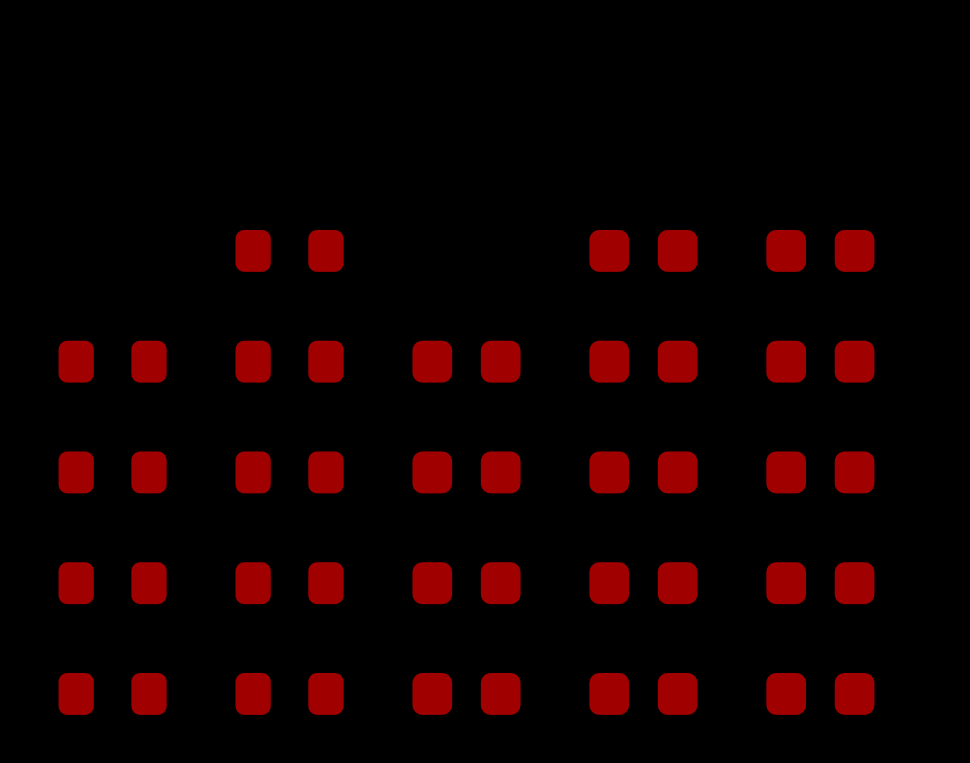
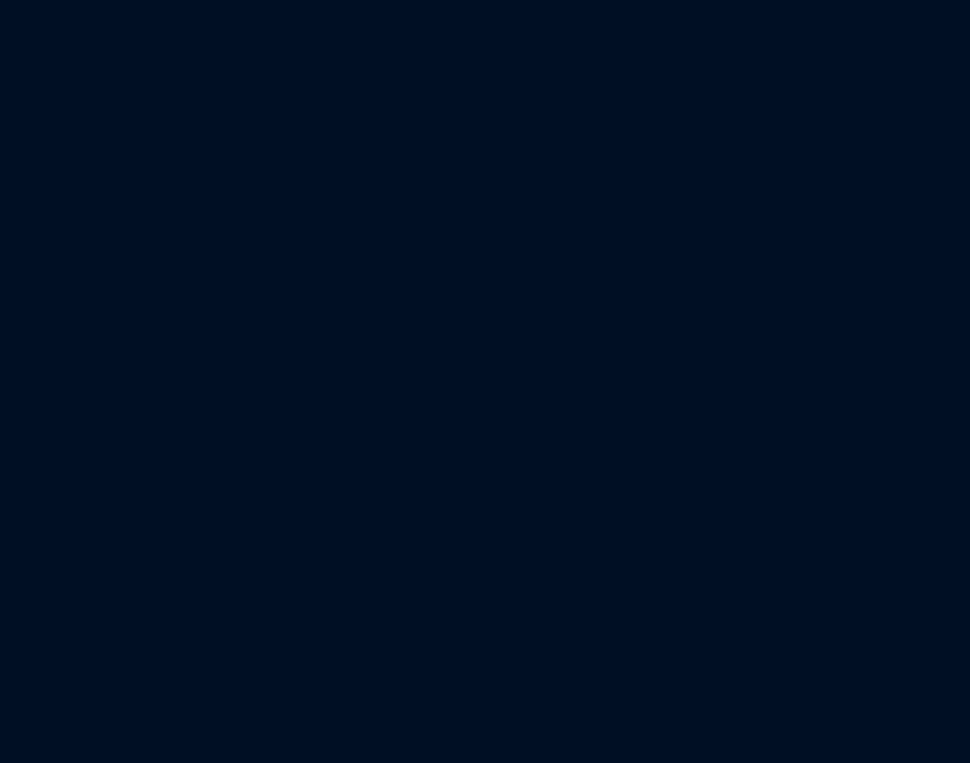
part: (289, 250) -> none
part: (643, 250) -> none
part: (820, 250) -> none
part: (112, 361) -> none
part: (289, 361) -> none
part: (466, 361) -> none
part: (643, 361) -> none
part: (820, 361) -> none
part: (112, 472) -> none
part: (289, 472) -> none
part: (466, 472) -> none
part: (643, 472) -> none
part: (820, 472) -> none
part: (112, 583) -> none
part: (289, 583) -> none
part: (466, 583) -> none
part: (643, 583) -> none
part: (820, 583) -> none
part: (112, 693) -> none
part: (289, 693) -> none
part: (466, 693) -> none
part: (643, 693) -> none
part: (820, 693) -> none

